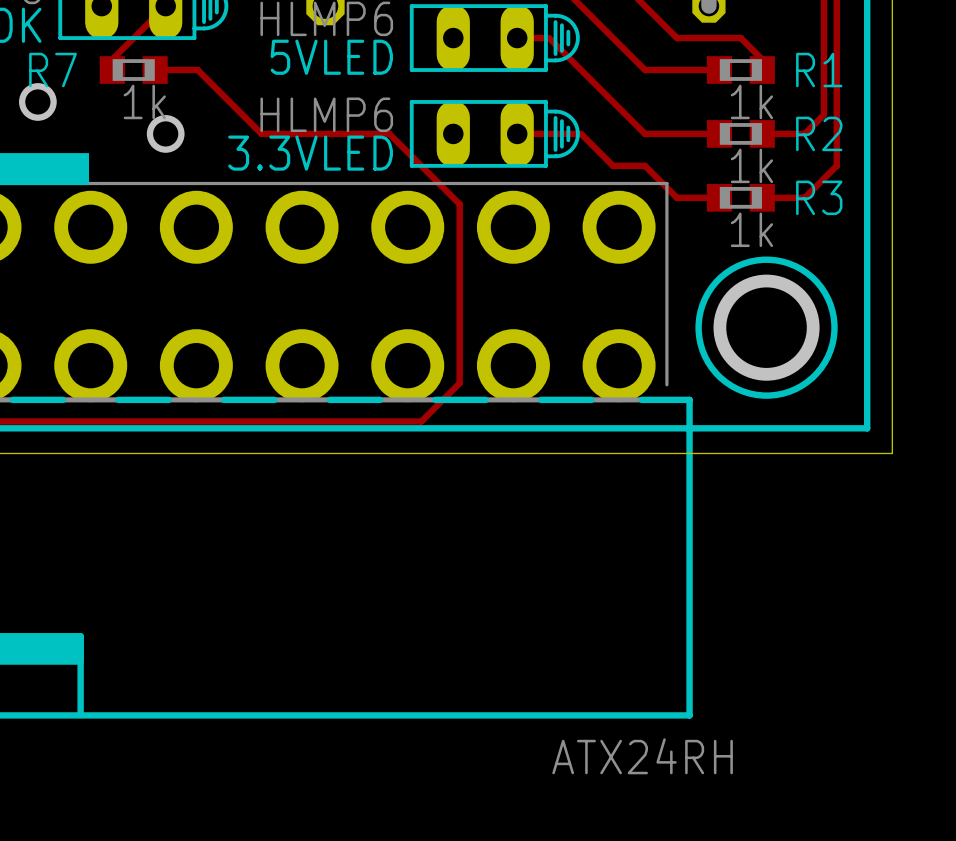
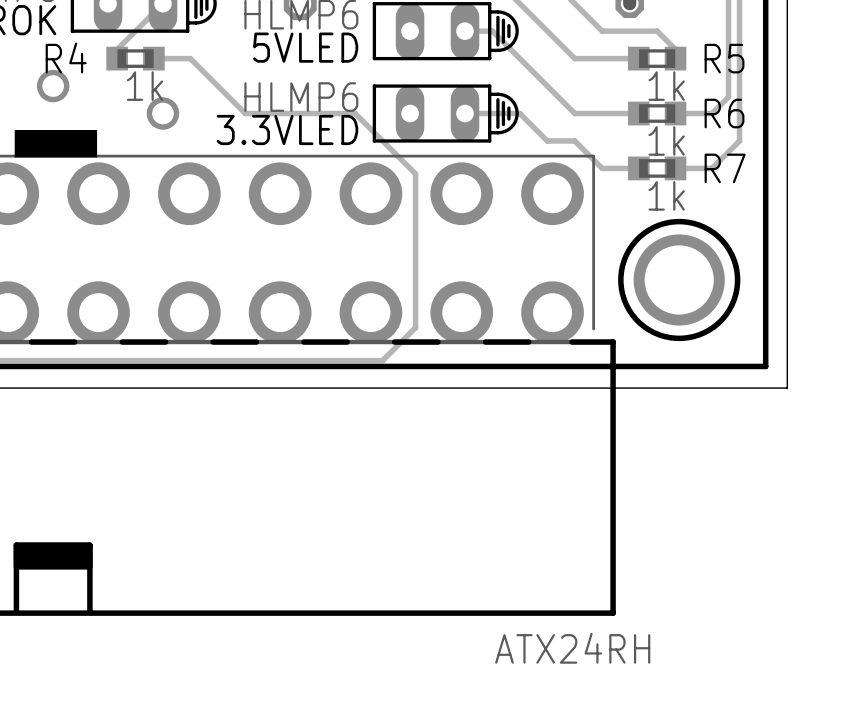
R7 name: R7 (53, 70) -> R4 (66, 57)
R1 name: R1 (819, 70) -> R5 (724, 58)
R2 name: R2 (819, 133) -> R6 (724, 113)
R3 name: R3 (819, 197) -> R7 (725, 168)

